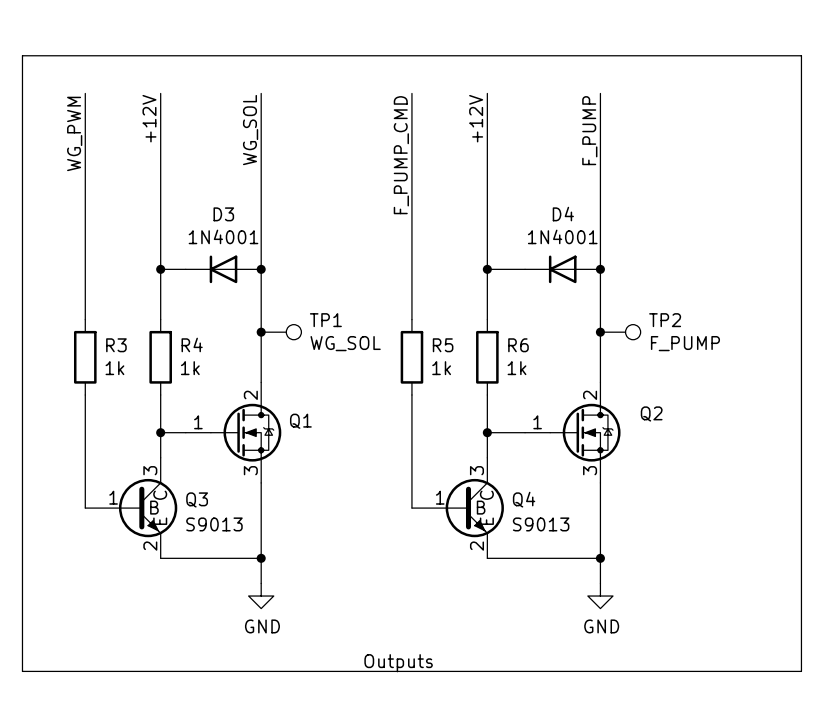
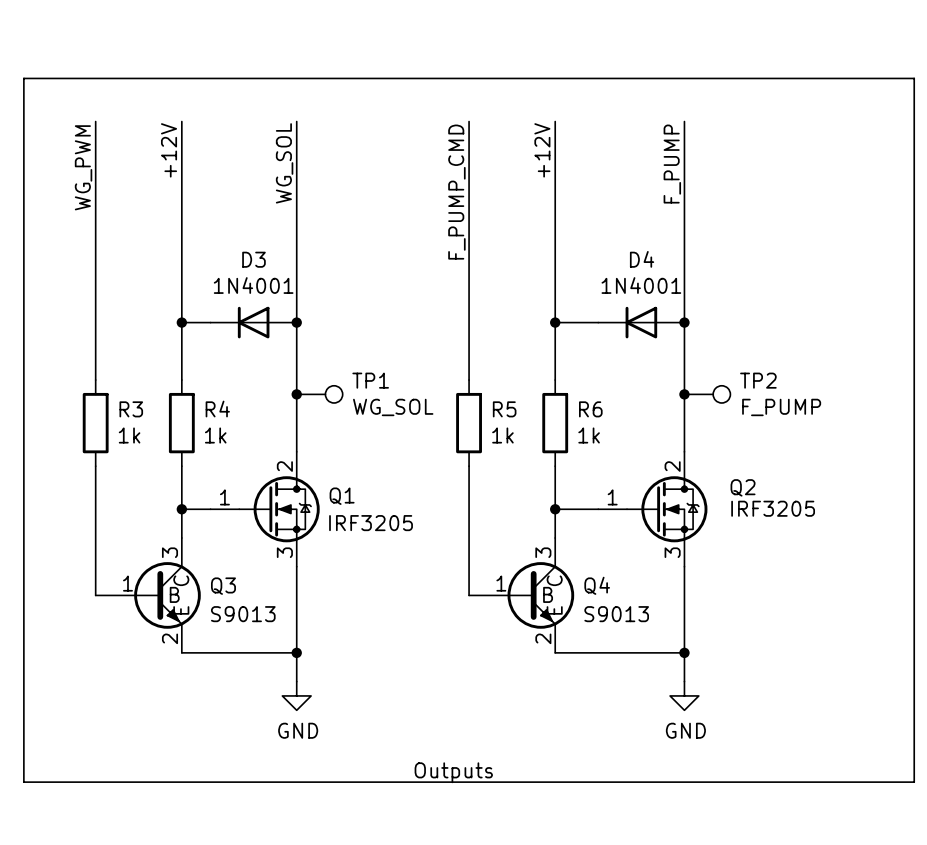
Q2 value: none -> IRF3205 (773, 508)
Q1 value: none -> IRF3205 (371, 523)

